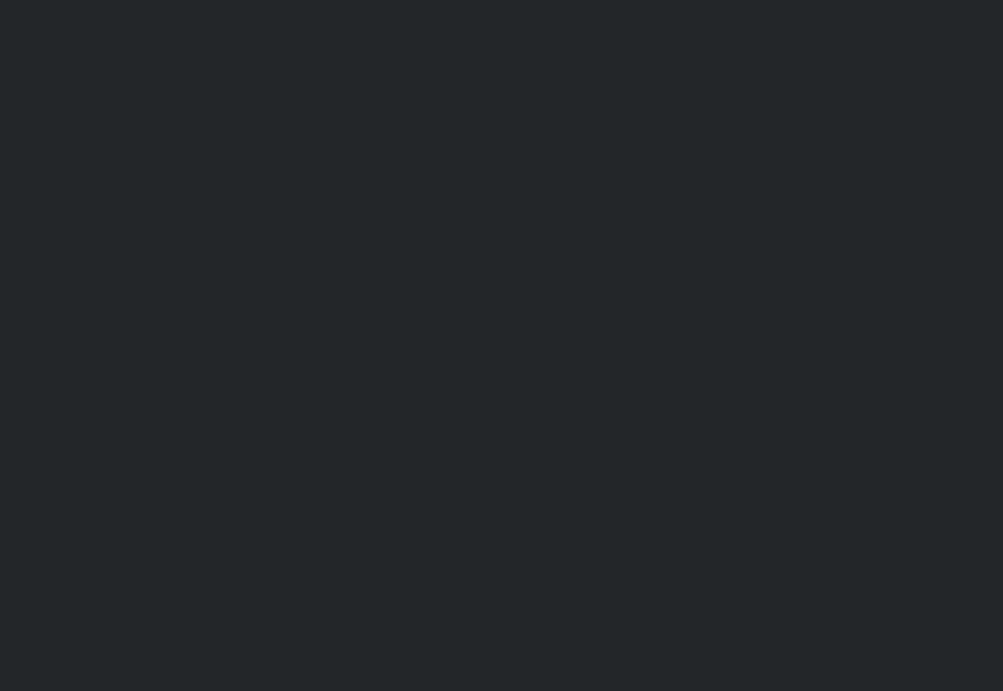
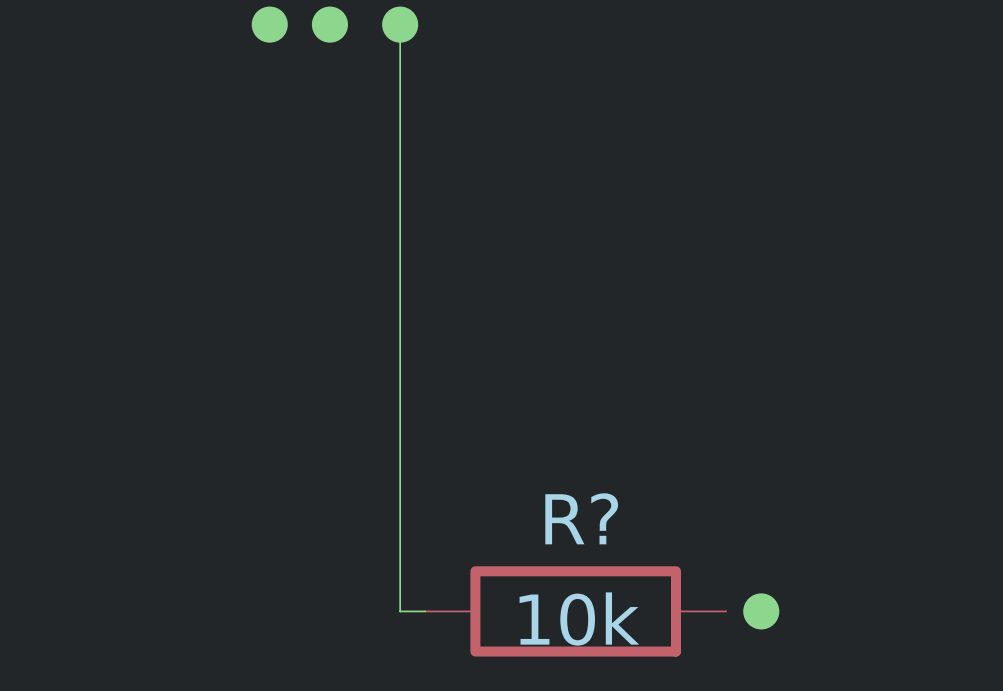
junction: none -> (269, 24)
junction: none -> (329, 24)
wire: none -> (400, 24) (400, 611) (425, 611)
junction: none -> (400, 24)
R?: none -> 10k (575, 611)
junction: none -> (761, 611)

